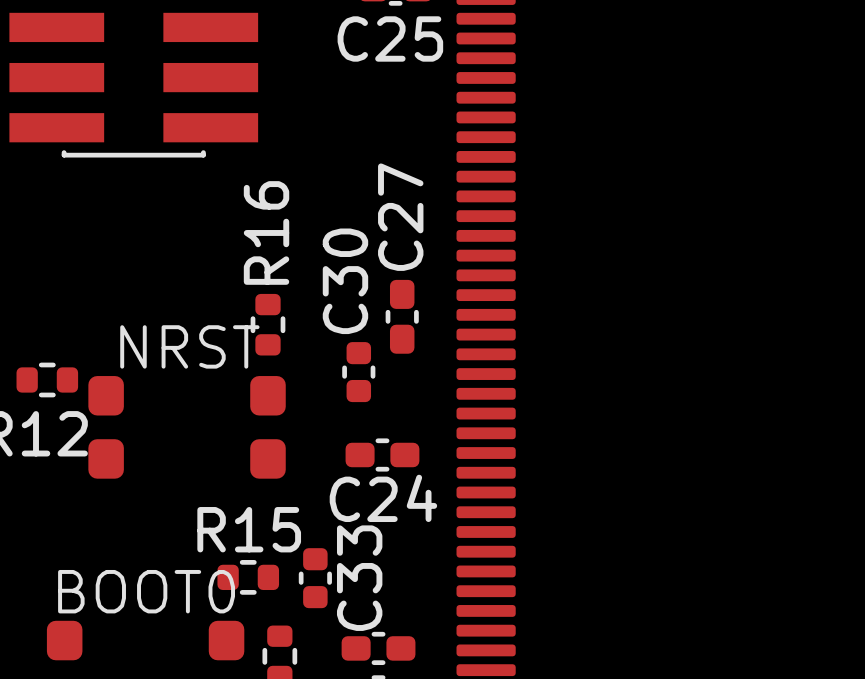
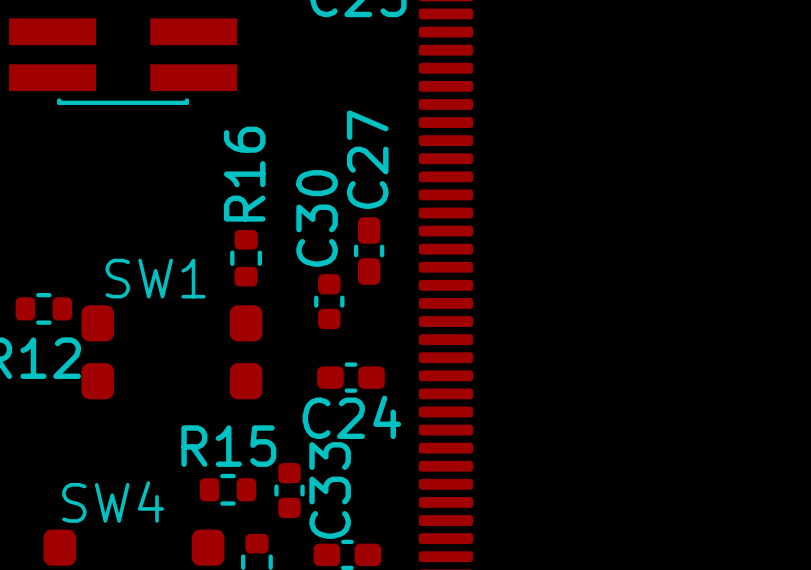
NRST name: NRST (189, 346) -> SW1 (155, 278)
BOOT0 name: BOOT0 (146, 591) -> SW4 (113, 502)

